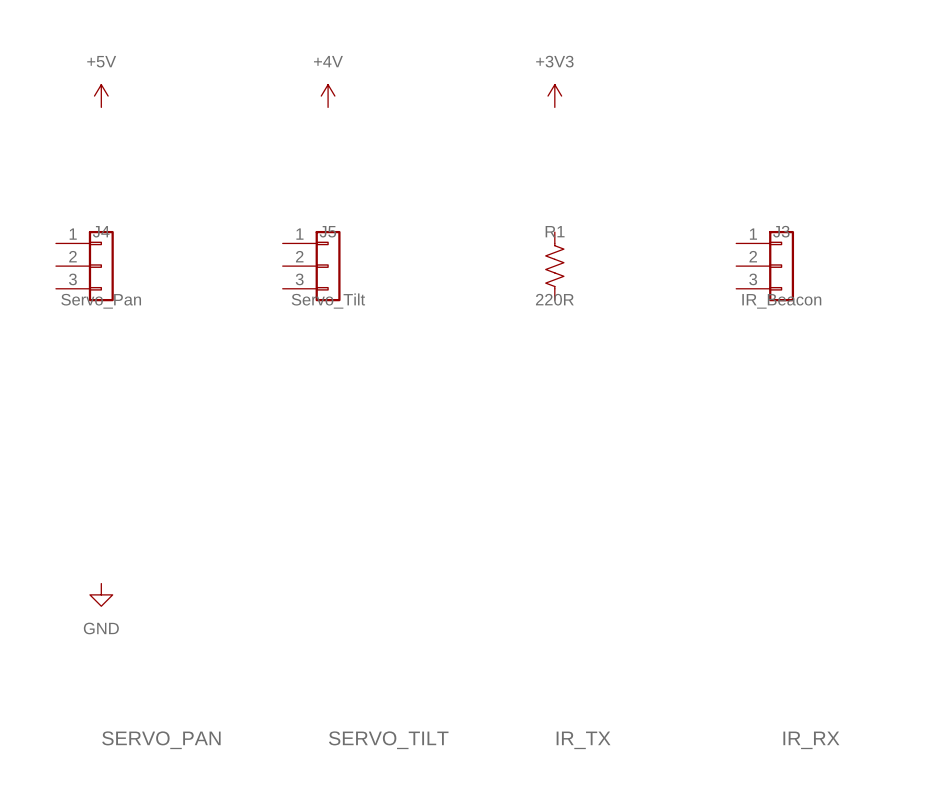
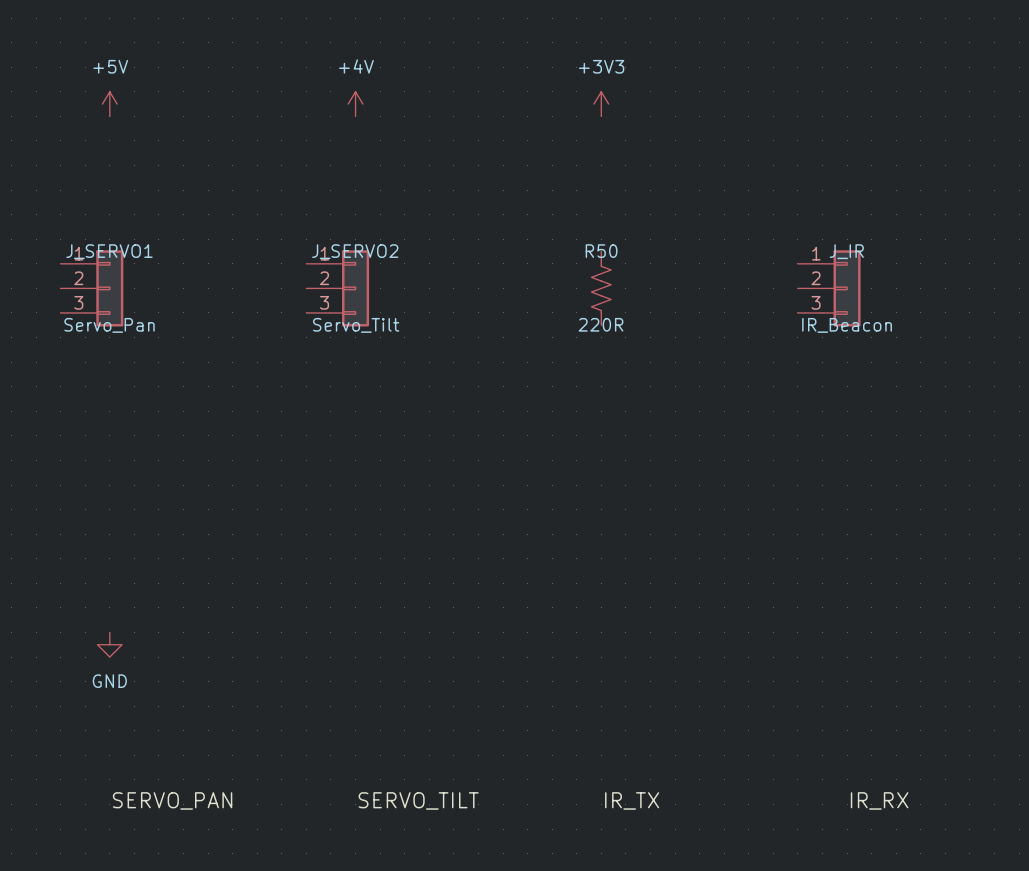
J4 name: J4 (101, 231) -> J_SERVO1 (109, 251)
J5 name: J5 (327, 231) -> J_SERVO2 (355, 251)
R1 name: R1 (555, 231) -> R50 (601, 251)
J3 name: J3 (781, 231) -> J_IR (846, 251)

